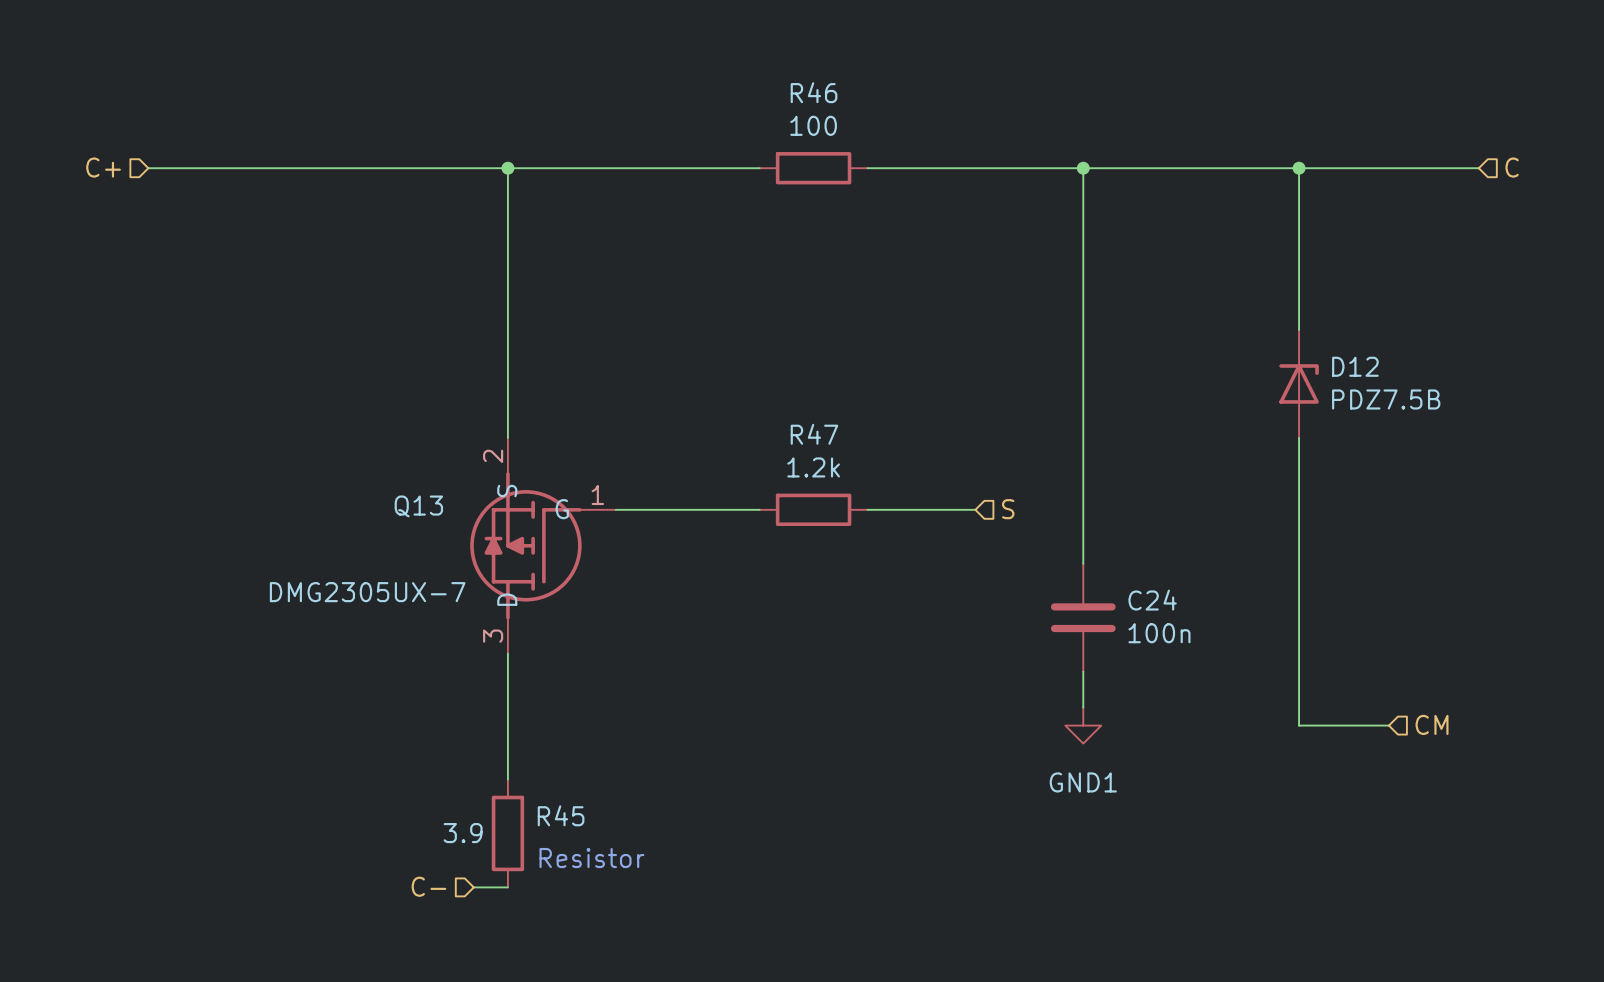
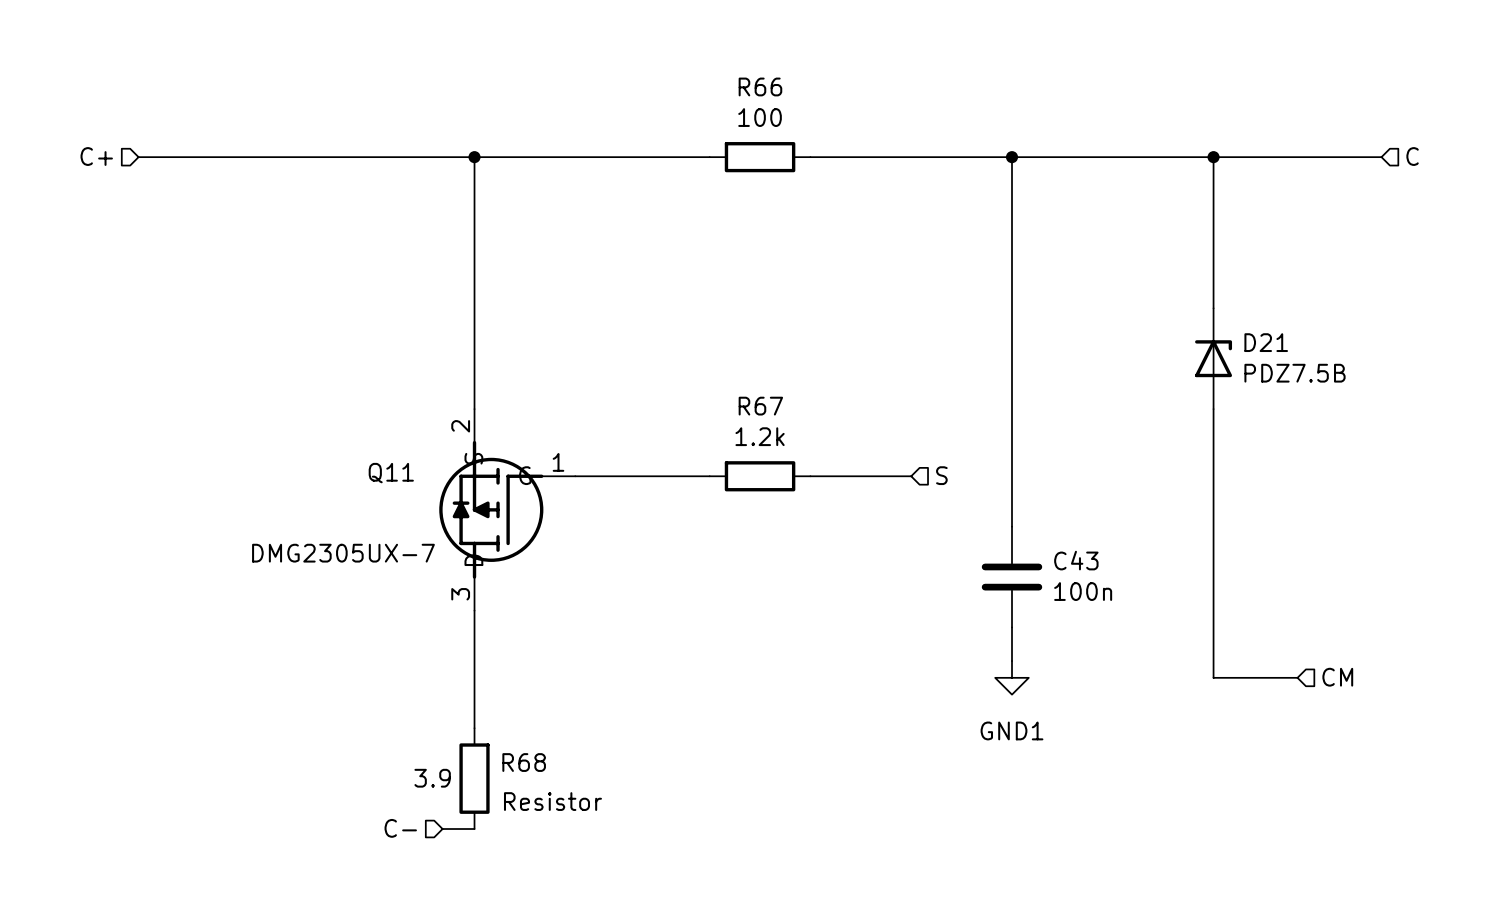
R46 name: R46 (814, 92) -> R66 (760, 86)
D12 name: D12 (1355, 366) -> D21 (1266, 342)
R47 name: R47 (814, 434) -> R67 (760, 406)
Q13 name: Q13 (418, 506) -> Q11 (391, 473)
C24 name: C24 (1152, 600) -> C43 (1076, 560)
R45 name: R45 (561, 815) -> R68 (524, 762)

